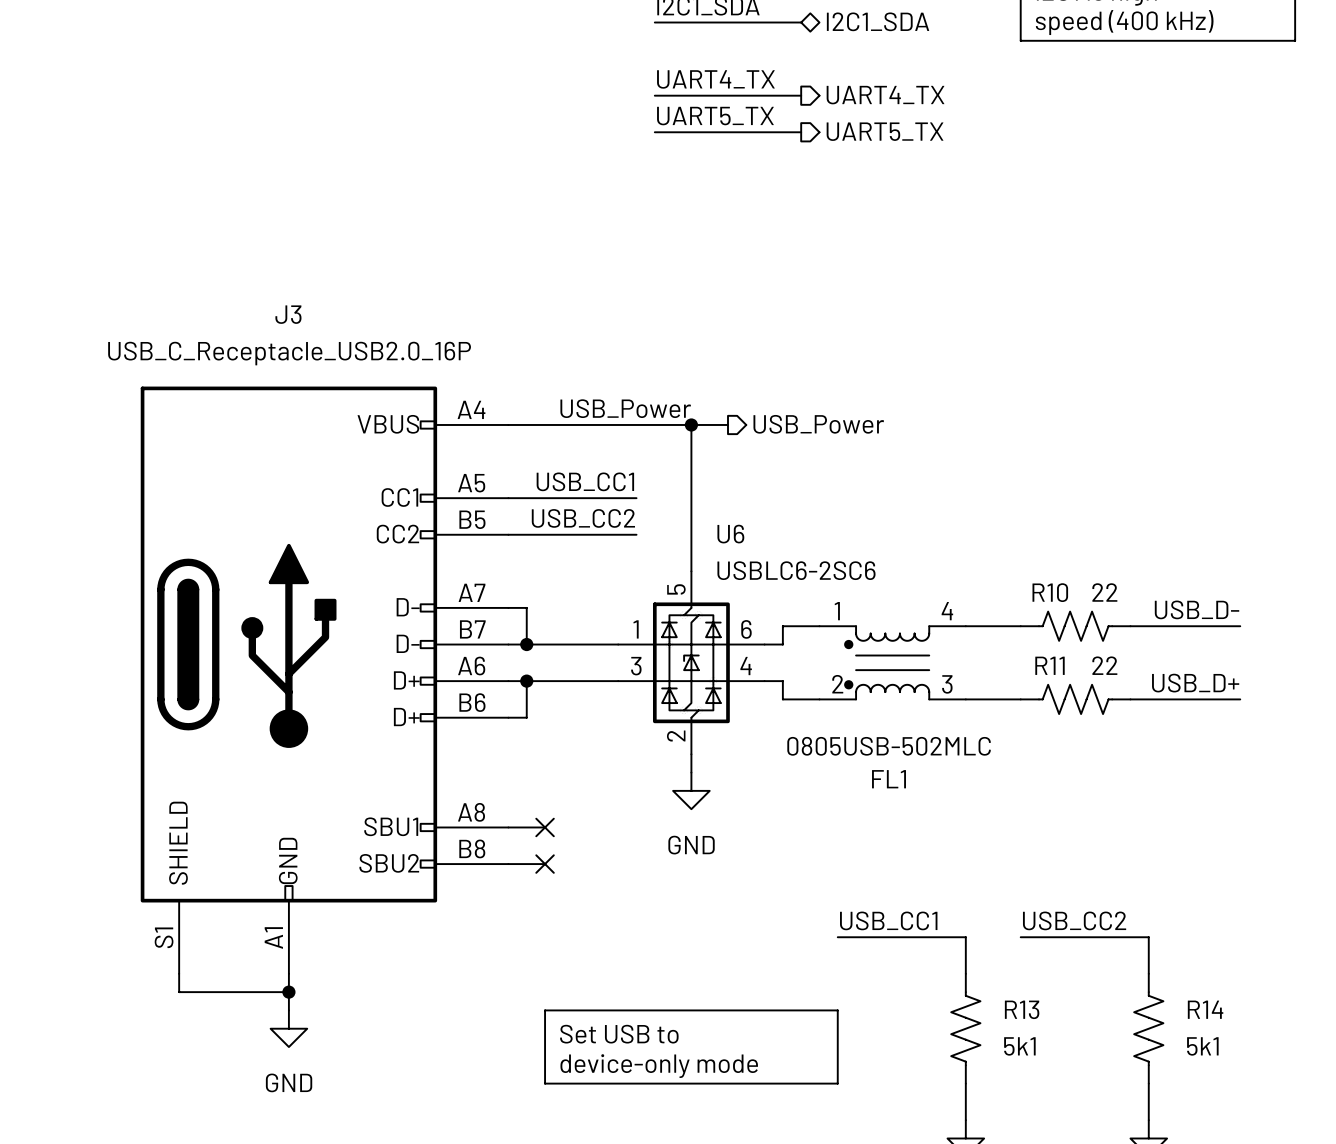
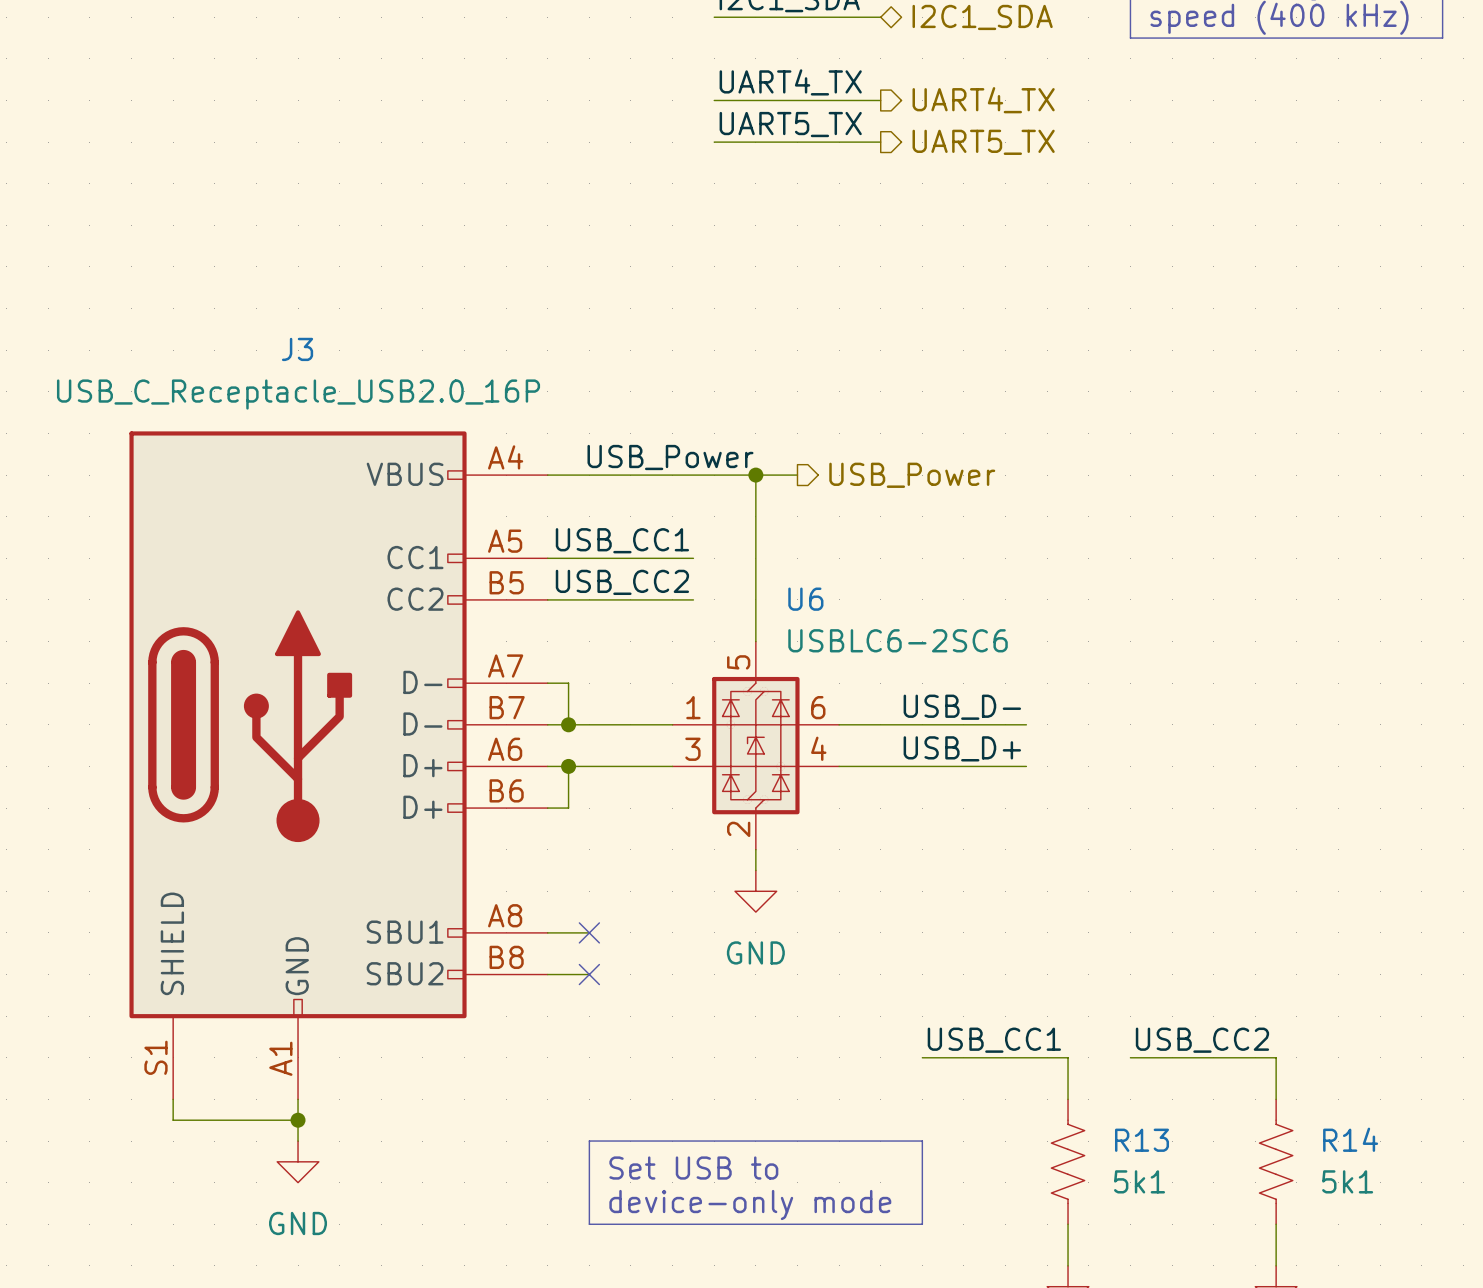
label position: USB_D- (1197, 609) -> USB_D- (962, 707)
wire: (819, 626) (782, 626) (782, 644) -> (1026, 724) (859, 724)
wire: (965, 626) (1020, 626) -> none
R10: 22 (1075, 626) -> none
wire: (1130, 626) (1240, 626) -> none
FL1: 0805USB-502MLC (892, 662) -> none
wire: (782, 681) (782, 699) (819, 699) -> (859, 766) (1026, 766)
label position: USB_D+ (1195, 683) -> USB_D+ (962, 748)
wire: (965, 699) (1020, 699) -> none
R11: 22 (1075, 699) -> none
wire: (1130, 699) (1240, 699) -> none

